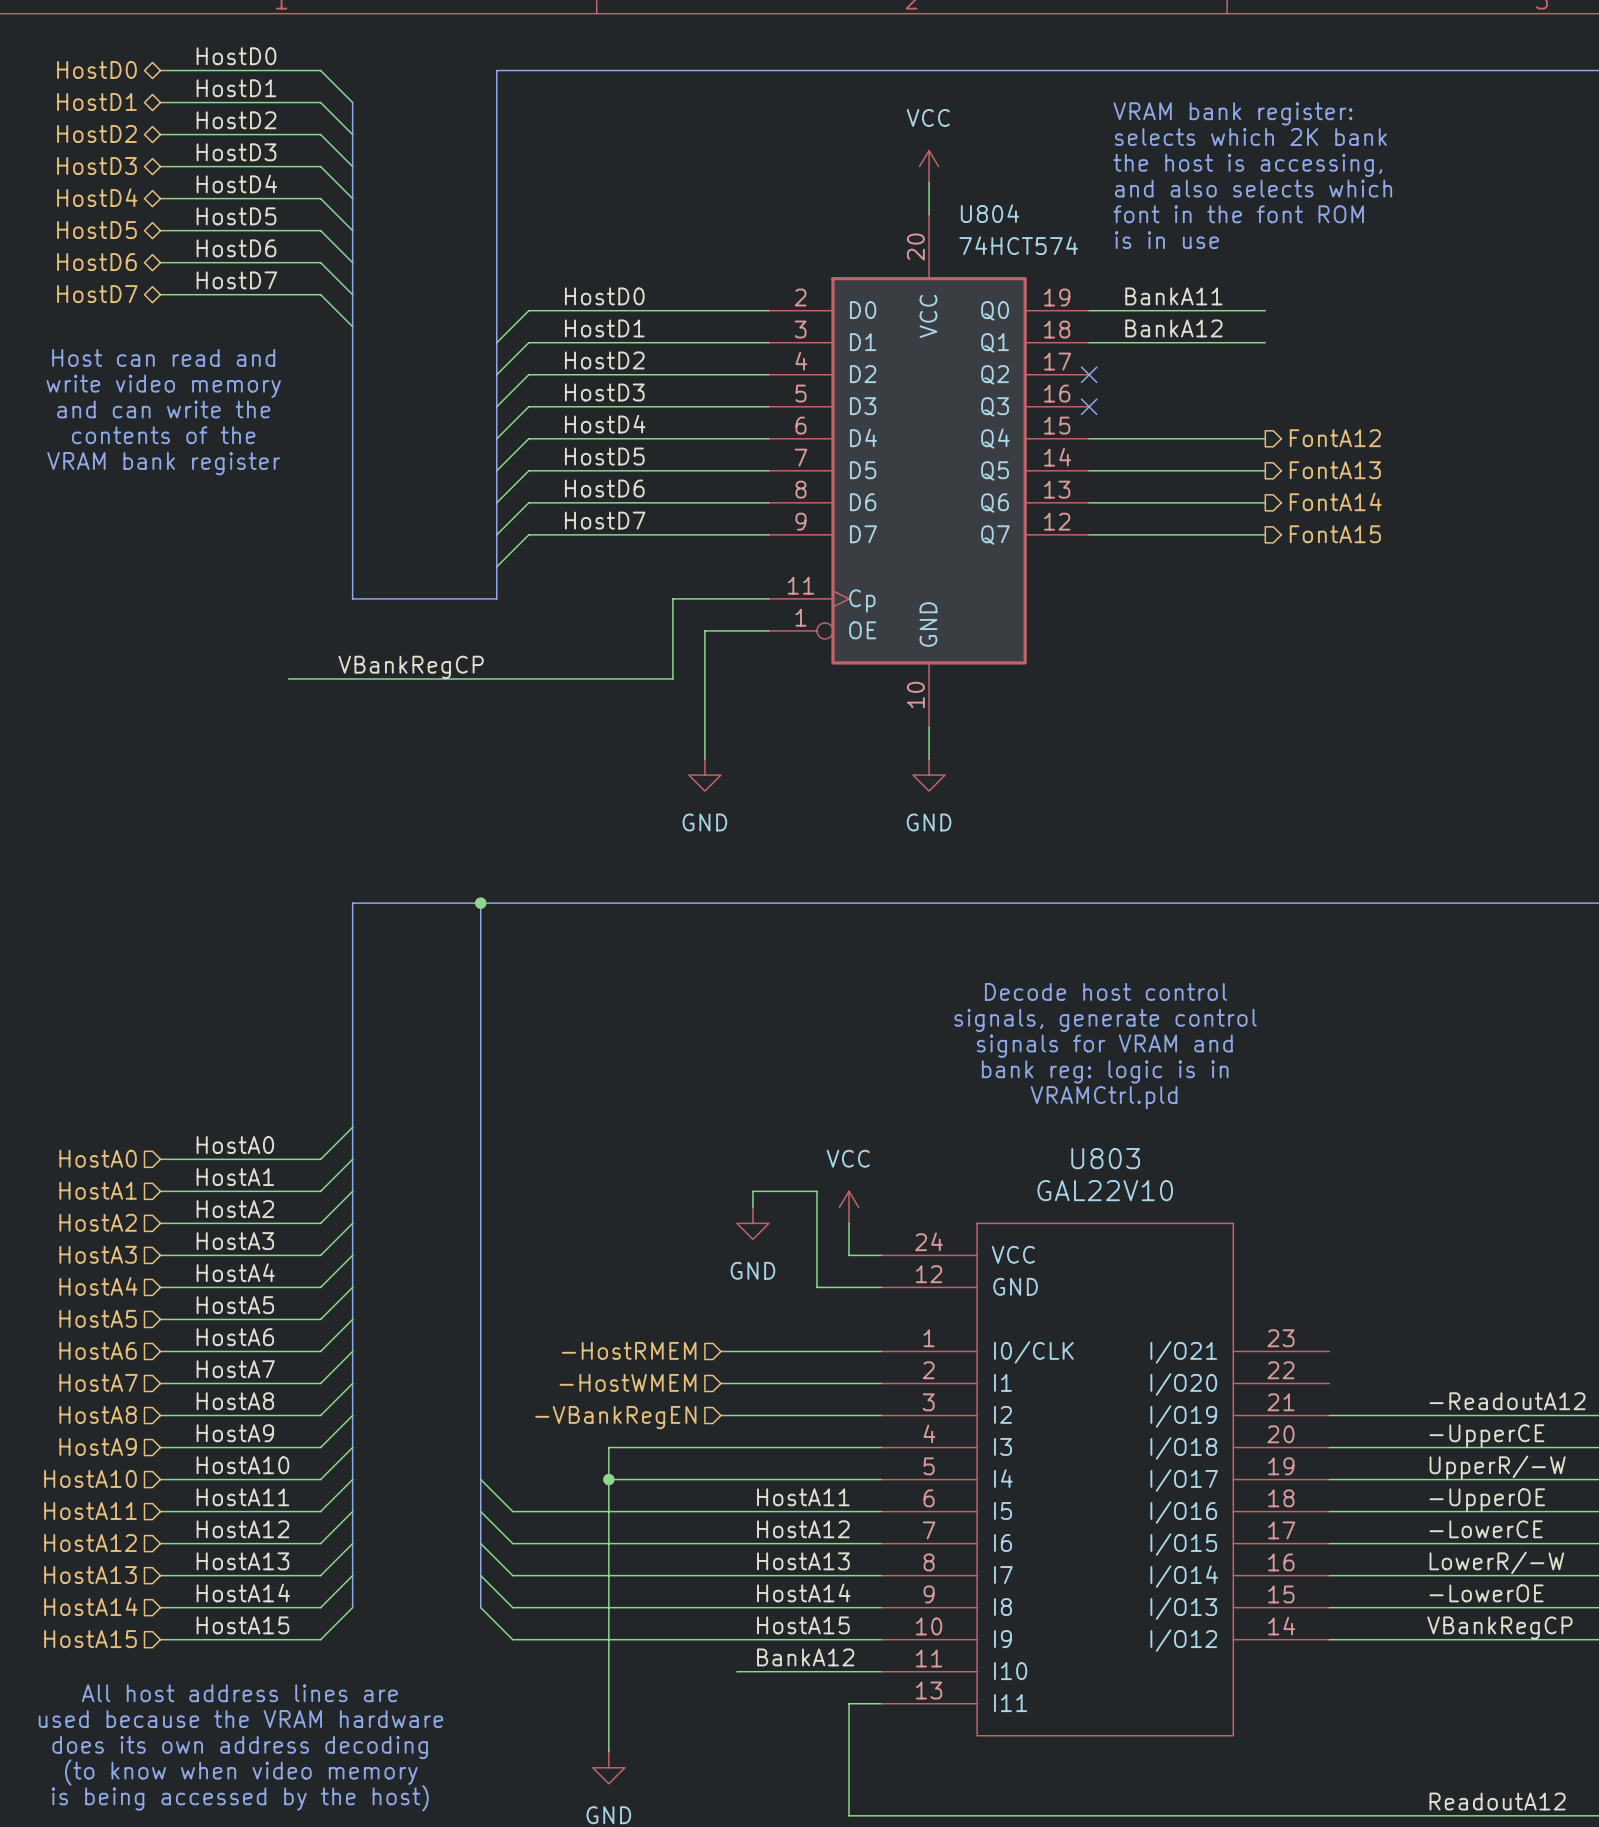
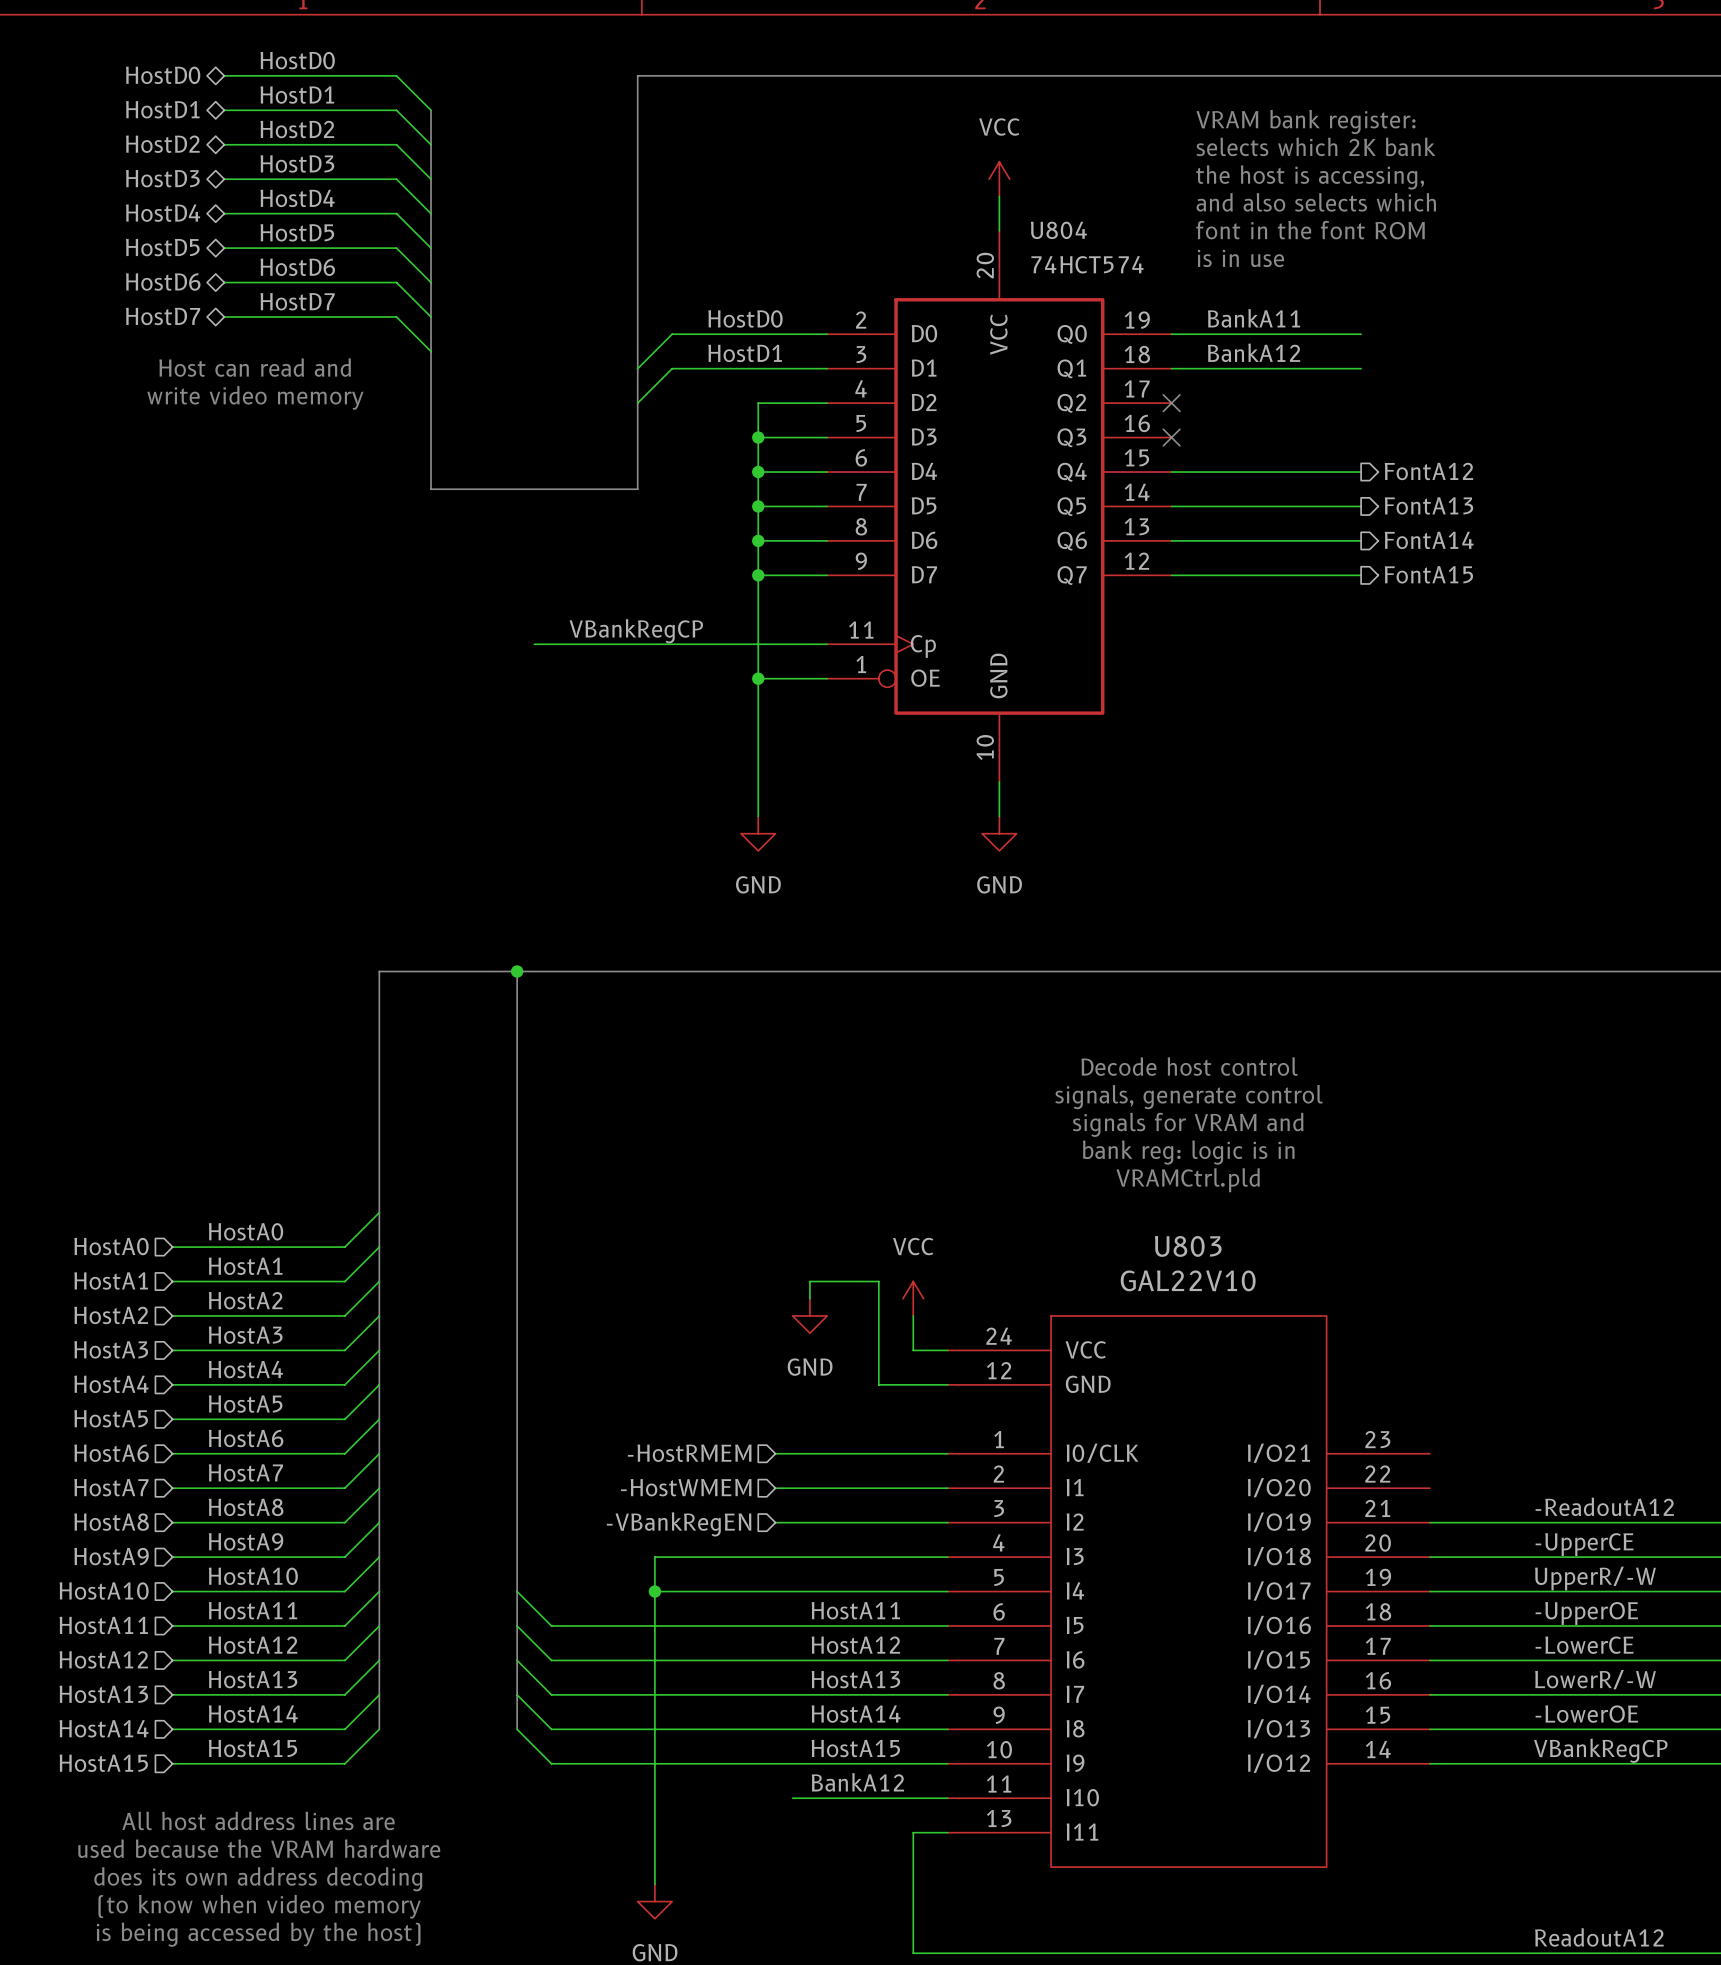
label position: HostD0 (236, 56) -> HostD0 (297, 60)
hierarchical label position: HostD0 (96, 69) -> HostD0 (163, 75)
wire: (160, 70) (208, 70) -> none
wire: (320, 70) (352, 102) -> (344, 75) (396, 75) (431, 110)
bus: (592, 70) (496, 70) (496, 598) (352, 598) (352, 102) -> (637, 75) (637, 489) (431, 489) (431, 110)
label position: HostD1 (236, 88) -> HostD1 (297, 95)
hierarchical label position: HostD1 (96, 101) -> HostD1 (162, 109)
wire: (160, 102) (208, 102) -> none
wire: (320, 102) (352, 134) -> (344, 110) (396, 110) (431, 144)
label position: HostD2 (236, 120) -> HostD2 (297, 129)
hierarchical label position: HostD2 (96, 133) -> HostD2 (162, 144)
wire: (160, 134) (208, 134) -> none
wire: (320, 134) (352, 166) -> (344, 144) (396, 144) (431, 179)
label position: HostD3 (236, 152) -> HostD3 (297, 163)
hierarchical label position: HostD3 (96, 166) -> HostD3 (162, 178)
wire: (160, 166) (208, 166) -> none
wire: (320, 166) (352, 198) -> (344, 179) (396, 179) (431, 213)
label position: HostD4 (236, 183) -> HostD4 (297, 198)
hierarchical label position: HostD4 (97, 197) -> HostD4 (163, 213)
wire: (160, 198) (208, 198) -> none
wire: (320, 198) (352, 230) -> (344, 213) (396, 213) (431, 248)
label position: HostD5 (236, 216) -> HostD5 (297, 232)
hierarchical label position: HostD5 (96, 230) -> HostD5 (162, 247)
wire: (160, 230) (208, 230) -> none
wire: (320, 230) (352, 262) -> (344, 248) (396, 248) (431, 282)
label position: HostD6 (236, 248) -> HostD6 (297, 267)
hierarchical label position: HostD6 (96, 262) -> HostD6 (163, 282)
wire: (160, 262) (208, 262) -> none
wire: (320, 262) (352, 294) -> (344, 282) (396, 282) (431, 317)
label position: HostD7 (236, 280) -> HostD7 (297, 301)
hierarchical label position: HostD7 (97, 294) -> HostD7 (163, 316)
wire: (160, 294) (208, 294) -> none
wire: (320, 294) (352, 326) -> (344, 317) (396, 317) (431, 351)
label position: HostD0 (604, 296) -> HostD0 (745, 318)
wire: (624, 310) (528, 310) (496, 342) -> (672, 334) (637, 368)
label position: HostD1 (604, 328) -> HostD1 (745, 353)
wire: (624, 342) (528, 342) (496, 374) -> (672, 368) (637, 403)
text position: Host can read and (163, 357) -> Host can read and (255, 367)
label: HostD2 (604, 360) -> none
wire: (704, 374) (528, 374) (496, 406) -> (758, 403) (758, 678)
text position: write video memory (163, 386) -> write video memory (255, 397)
label: HostD3 (604, 392) -> none
wire: (704, 406) (528, 406) (496, 438) -> none
junction: none -> (758, 437)
text: and can write the (163, 409) -> none
label: HostD4 (605, 424) -> none
text: contents of the (163, 435) -> none
wire: (704, 438) (528, 438) (496, 470) -> none
junction: none -> (758, 472)
label: HostD5 (604, 456) -> none
text: VRAM bank register (163, 463) -> none
wire: (704, 470) (528, 470) (496, 502) -> none
junction: none -> (758, 506)
label: HostD6 (604, 488) -> none
wire: (704, 502) (528, 502) (496, 534) -> none
junction: none -> (758, 540)
label: HostD7 (605, 520) -> none
wire: (704, 534) (528, 534) (496, 566) -> none
junction: none -> (758, 575)
wire: (672, 598) (672, 678) (288, 678) -> (723, 644) (534, 644)
junction: none -> (758, 678)
label position: VBankRegCP (411, 667) -> VBankRegCP (636, 631)

